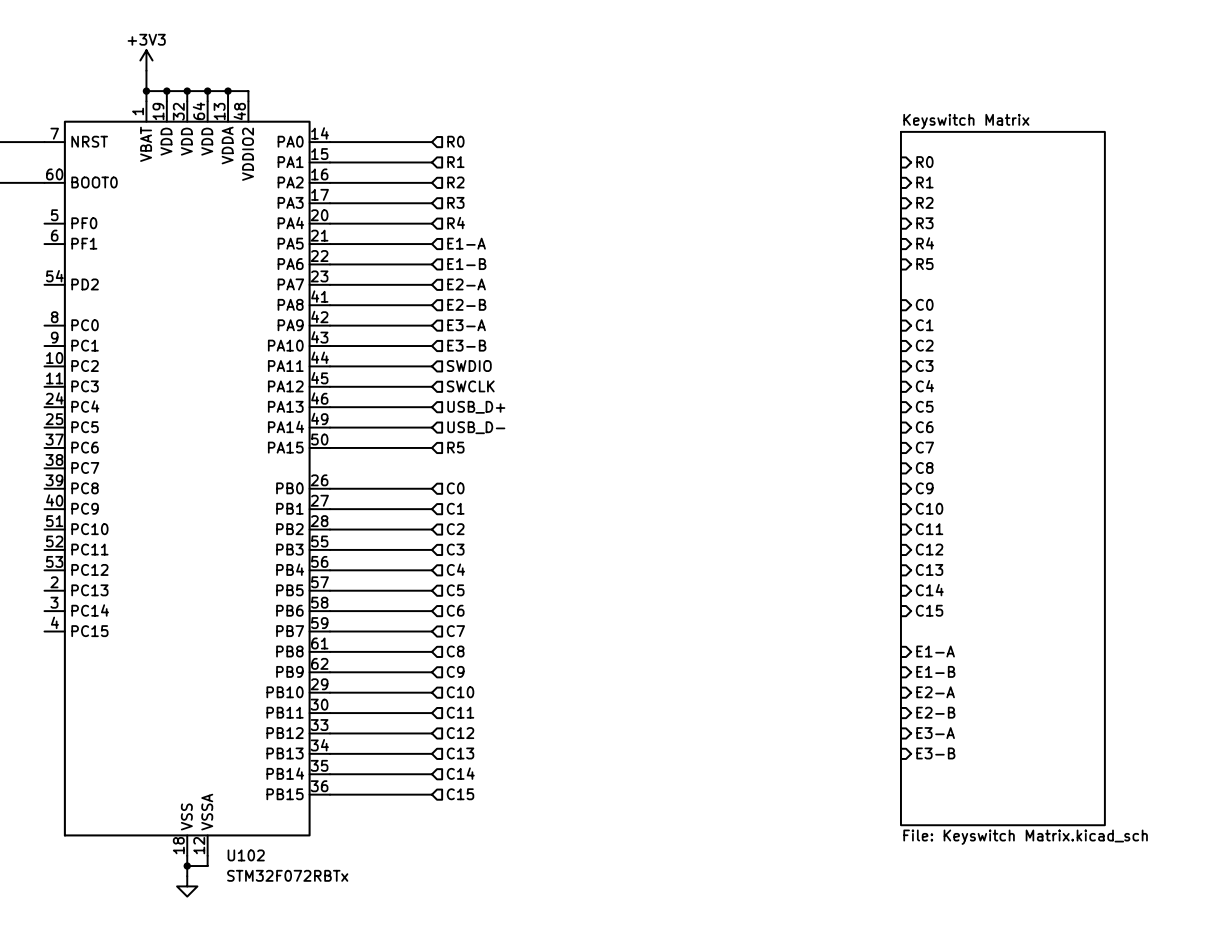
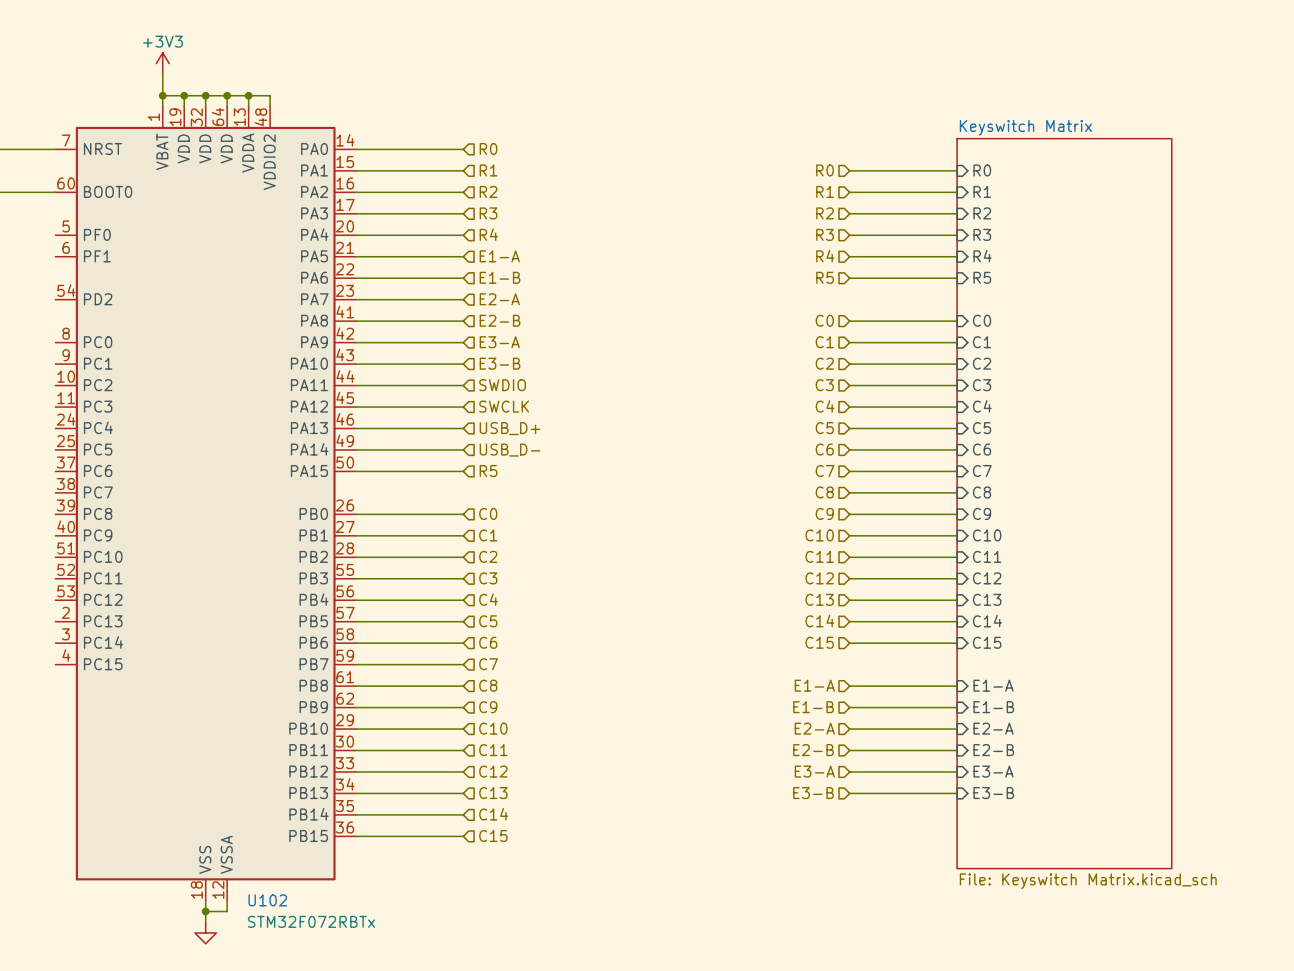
hierarchical label: none -> R0 (825, 170)
wire: none -> (849, 170) (957, 170)
hierarchical label: none -> R1 (825, 191)
wire: none -> (849, 192) (957, 192)
hierarchical label: none -> R2 (825, 213)
wire: none -> (849, 213) (957, 213)
hierarchical label: none -> R3 (825, 234)
wire: none -> (849, 235) (957, 235)
hierarchical label: none -> R4 (825, 256)
wire: none -> (849, 256) (957, 256)
hierarchical label: none -> R5 (825, 277)
wire: none -> (849, 278) (957, 278)
hierarchical label: none -> C0 (824, 320)
wire: none -> (849, 321) (957, 321)
hierarchical label: none -> C1 (824, 342)
wire: none -> (849, 342) (957, 342)
hierarchical label: none -> C2 (824, 363)
wire: none -> (849, 364) (957, 364)
hierarchical label: none -> C3 (824, 385)
wire: none -> (849, 385) (957, 385)
hierarchical label: none -> C4 (825, 406)
wire: none -> (849, 407) (957, 407)
hierarchical label: none -> C5 (824, 428)
wire: none -> (849, 428) (957, 428)
hierarchical label: none -> C6 (824, 449)
wire: none -> (849, 449) (957, 449)
hierarchical label: none -> C7 (825, 471)
wire: none -> (849, 471) (957, 471)
hierarchical label: none -> C8 (824, 492)
wire: none -> (849, 492) (957, 492)
hierarchical label: none -> C9 (824, 513)
wire: none -> (849, 514) (957, 514)
hierarchical label: none -> C10 (819, 535)
wire: none -> (849, 535) (957, 535)
hierarchical label: none -> C11 (819, 556)
wire: none -> (849, 557) (957, 557)
hierarchical label: none -> C12 (819, 578)
wire: none -> (849, 578) (957, 578)
hierarchical label: none -> C13 (819, 599)
wire: none -> (849, 600) (957, 600)
hierarchical label: none -> C14 (819, 621)
wire: none -> (849, 621) (957, 621)
hierarchical label: none -> C15 (819, 642)
wire: none -> (849, 643) (957, 643)
hierarchical label: none -> E1-A (814, 685)
wire: none -> (849, 686) (957, 686)
hierarchical label: none -> E1-B (813, 707)
wire: none -> (849, 707) (957, 707)
hierarchical label: none -> E2-A (814, 728)
wire: none -> (849, 729) (957, 729)
hierarchical label: none -> E2-B (813, 750)
wire: none -> (849, 750) (957, 750)
hierarchical label: none -> E3-A (814, 771)
wire: none -> (849, 771) (957, 771)
hierarchical label: none -> E3-B (813, 793)
wire: none -> (849, 793) (957, 793)

